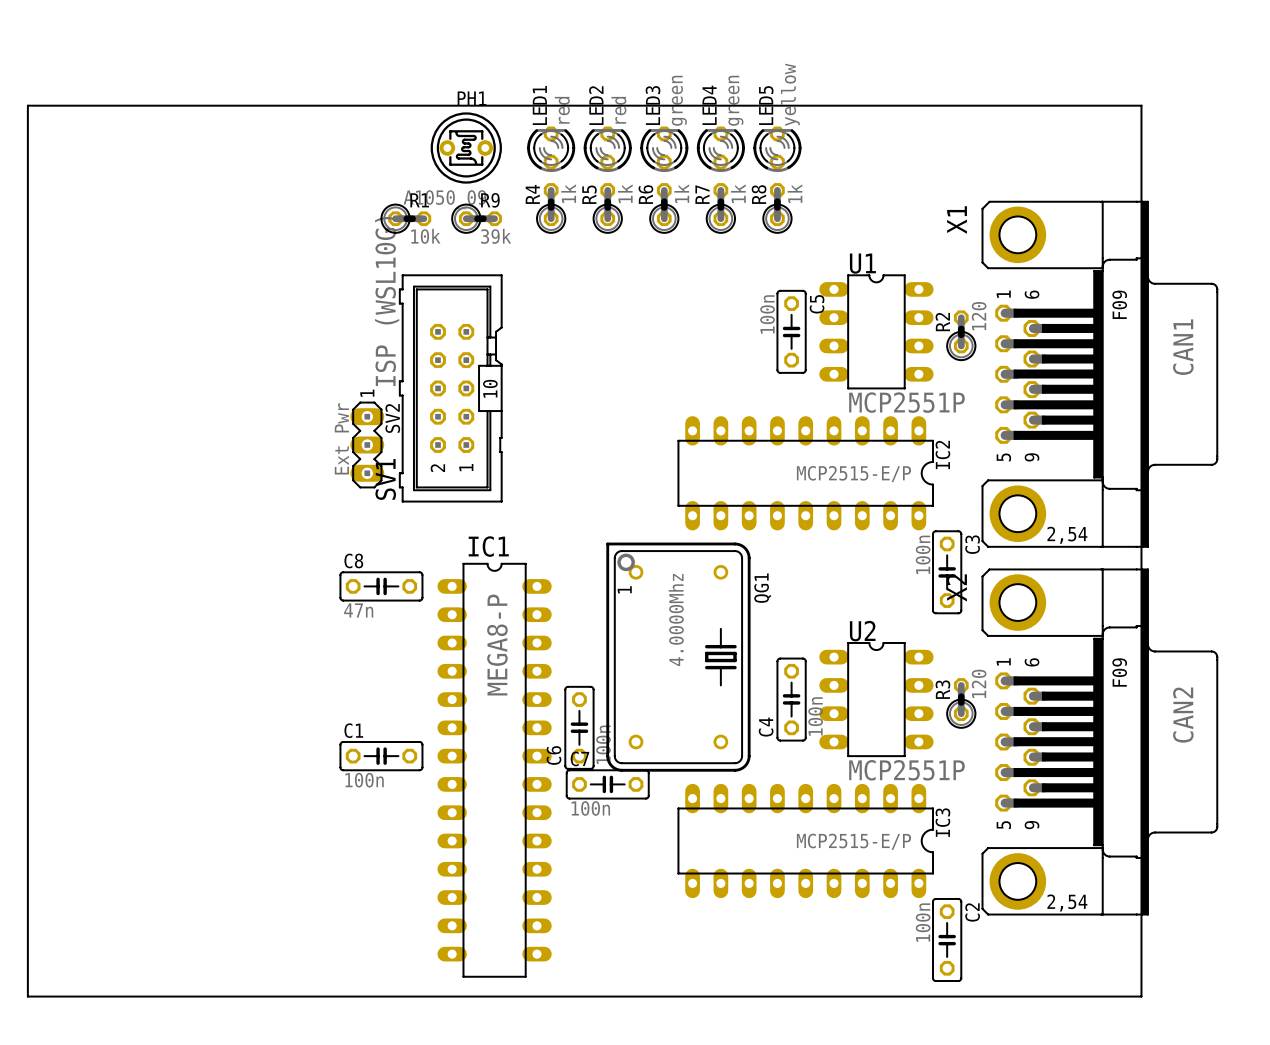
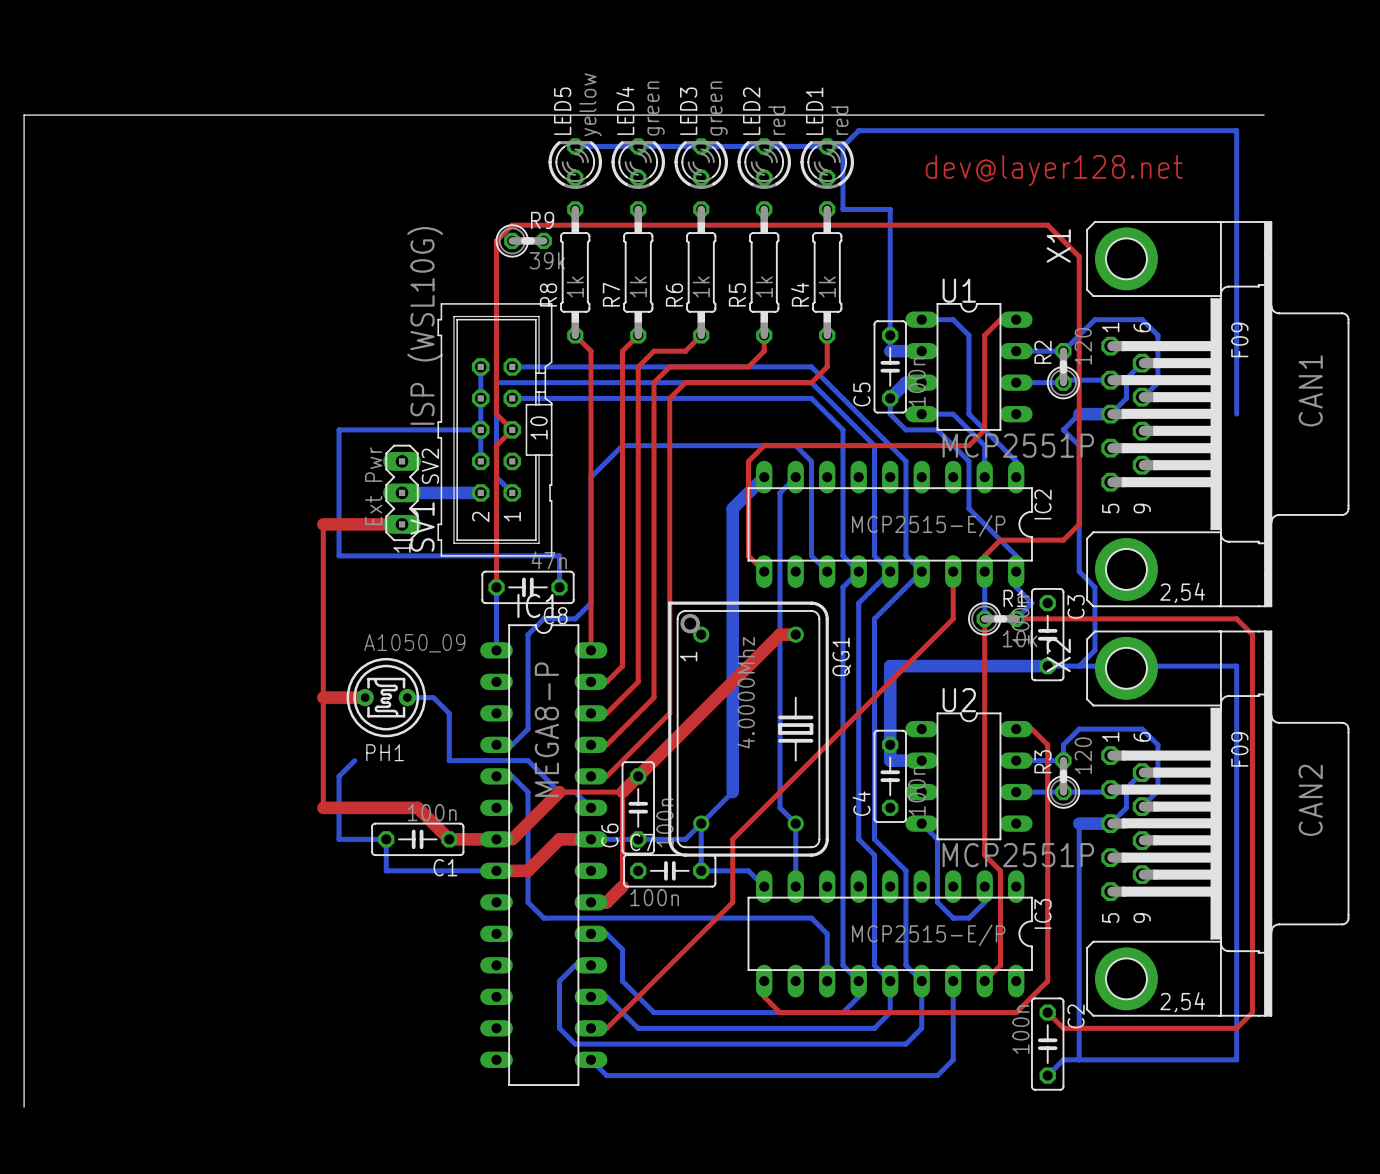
board edge: (1141, 105) (1141, 996) (27, 996) -> none
bottom track: none -> (575, 146) (842, 146)
bottom track: none -> (842, 146) (842, 209) (890, 209) (890, 351) (921, 351)
bottom track: none -> (842, 146) (858, 130) (1236, 130) (1236, 414)
PH1 rotation: 0° (466, 148) -> 180° (386, 697)
PH1 position: (466, 148) -> (386, 697)
LED1 position: (551, 149) -> (827, 163)
LED2 position: (607, 149) -> (764, 163)
LED3 position: (664, 149) -> (701, 163)
LED4 position: (720, 149) -> (638, 163)
LED5 position: (777, 149) -> (575, 163)
text: none -> dev@layer128.net (1054, 170)
R4 footprint: [536, 183, 567, 234] -> [812, 201, 843, 344]
R5 footprint: [592, 183, 623, 234] -> [749, 201, 780, 344]
R6 footprint: [649, 183, 680, 234] -> [686, 201, 717, 344]
R7 footprint: [705, 183, 736, 234] -> [623, 201, 654, 344]
R8 footprint: [762, 183, 793, 234] -> [560, 201, 591, 344]
R4 value position: 1k (568, 193) -> 1k (827, 286)
R5 value position: 1k (625, 193) -> 1k (764, 286)
R6 value position: 1k (681, 193) -> 1k (701, 286)
R7 value position: 1k (738, 193) -> 1k (638, 286)
R8 value position: 1k (794, 193) -> 1k (575, 286)
R4 name position: R4 (532, 194) -> R4 (800, 294)
R5 name position: R5 (589, 194) -> R5 (737, 295)
R6 name position: R6 (645, 194) -> R6 (674, 295)
R7 name position: R7 (702, 194) -> R7 (611, 294)
R8 name position: R8 (759, 194) -> R8 (548, 295)
R1 position: (405, 218) -> (996, 618)
bottom track: none -> (921, 319) (953, 319) (968, 335) (968, 414) (1016, 461) (1016, 477)
top track: none -> (1016, 319) (1000, 319) (984, 335) (984, 429) (968, 445) (764, 445) (748, 461) (748, 555) (764, 571)
top track: none -> (575, 335) (591, 351) (591, 650)
top track: none -> (638, 335) (622, 351) (622, 666) (606, 681) (591, 681)
top track: none -> (701, 335) (685, 351) (654, 351) (638, 366) (638, 681) (606, 713) (591, 713)
top track: none -> (764, 335) (764, 351) (748, 366) (669, 366) (654, 382) (654, 697) (606, 744) (591, 744)
top track: none -> (827, 335) (827, 366) (811, 382) (685, 382) (669, 398) (669, 713) (606, 776) (591, 776)
bottom track: none -> (1016, 351) (1063, 351) (1094, 319) (1142, 319) (1157, 335) (1157, 382) (1142, 398)
bottom track: none -> (1142, 363) (1126, 378) (1126, 398) (1110, 414) (1079, 414) (1063, 429) (1079, 445) (1079, 571) (1094, 587) (1094, 650) (1079, 666)
bottom track: none -> (480, 366) (480, 461)
bottom track: none -> (512, 366) (811, 366) (905, 461) (905, 555) (921, 571) (874, 618) (874, 839) (905, 870) (905, 965) (921, 981) (921, 1028) (905, 1044) (575, 1044) (559, 1028) (559, 981) (575, 965) (591, 965)
C5 rotation: 0° (791, 331) -> 180° (890, 366)
bottom track: none -> (1110, 380) (1016, 382)
bottom track: none -> (921, 382) (905, 382) (890, 398) (890, 414) (905, 429) (937, 429) (968, 461) (968, 508) (1016, 555) (1016, 587) (1031, 603) (1016, 618)
bottom track: none -> (512, 398) (811, 398) (842, 429) (842, 555) (858, 571) (842, 587) (842, 965) (858, 981) (858, 996) (842, 1012) (654, 1012) (622, 981) (622, 949) (606, 933) (591, 933)
bottom track: none -> (921, 414) (953, 414) (984, 445) (984, 477)
bottom track: none -> (480, 429) (339, 429) (339, 555) (559, 555) (559, 587)
SV2 text position: 1 (367, 393) -> 1 (402, 548)
bottom track: none -> (764, 477) (732, 508) (732, 792) (685, 839) (591, 839)
bottom track: none -> (795, 477) (779, 492) (779, 807) (795, 823) (795, 886)
bottom track: none -> (402, 492) (480, 492)
bottom track: none -> (512, 492) (496, 477) (496, 382) (811, 382) (874, 445) (874, 555) (890, 571) (858, 603) (858, 839) (874, 855) (874, 965) (890, 981) (890, 1012) (874, 1028) (638, 1028) (606, 996) (591, 996)
top track: none -> (402, 524) (323, 524) (323, 807) (417, 807) (449, 839) (512, 839) (559, 792) (622, 792)
bottom track: none -> (827, 571) (811, 555) (811, 461) (795, 445) (622, 445) (591, 477) (591, 603) (575, 618) (543, 618) (528, 634) (528, 729) (512, 744) (496, 744)
top track: none -> (953, 571) (953, 618) (732, 839) (732, 902) (606, 1028) (591, 1028)
bottom track: none -> (984, 571) (984, 618)
top track: none -> (984, 571) (984, 555) (1000, 540) (1063, 540) (1079, 524) (1079, 256) (1047, 225) (512, 225) (496, 240) (496, 414) (512, 429) (496, 445) (496, 587)
bottom track: none -> (496, 587) (496, 650)
top track: none -> (984, 618) (984, 855) (1000, 870) (1000, 965) (984, 981)
top track: none -> (1016, 618) (1236, 618) (1252, 634) (1252, 1012) (1236, 1028) (1063, 1028) (1047, 1012)
top track: none -> (795, 634) (779, 634) (622, 792)
C8 rotation: 0° (381, 586) -> 180° (528, 587)
C8 position: (381, 586) -> (528, 587)
top track: none -> (323, 697) (365, 697)
bottom track: none -> (402, 697) (433, 697) (449, 713) (449, 760) (528, 760) (559, 792) (575, 792) (591, 807)
top track: none -> (1031, 729) (1047, 744) (1047, 981) (1016, 1012) (779, 1012) (764, 996) (764, 981)
bottom track: none -> (354, 760) (339, 776) (339, 839) (386, 839) (386, 870) (496, 870)
bottom track: none -> (921, 760) (890, 760) (890, 666) (1236, 666) (1236, 1059) (1063, 1059) (1047, 1075)
bottom track: none -> (1016, 760) (1063, 760) (1063, 744) (1079, 729) (1142, 729) (1157, 744) (1157, 790) (1142, 806)
bottom track: none -> (1142, 772) (1126, 788) (1126, 807) (1110, 823) (1079, 823) (1079, 1059)
bottom track: none -> (496, 776) (512, 776) (528, 792) (528, 902) (543, 918) (811, 918) (827, 933) (827, 981)
C4 position: (791, 699) -> (890, 776)
bottom track: none -> (1110, 789) (1110, 792) (1016, 792)
top track: none -> (622, 792) (622, 886) (606, 902) (591, 902)
bottom track: none -> (701, 823) (701, 870) (748, 870) (764, 886)
bottom track: none -> (921, 823) (937, 839) (937, 902) (953, 918) (968, 918) (984, 902) (984, 886)
C1 rotation: 0° (381, 756) -> 180° (417, 839)
top track: none -> (591, 839) (559, 839) (528, 870) (496, 870)
bottom track: none -> (953, 981) (953, 1059) (937, 1075) (606, 1075) (591, 1059)

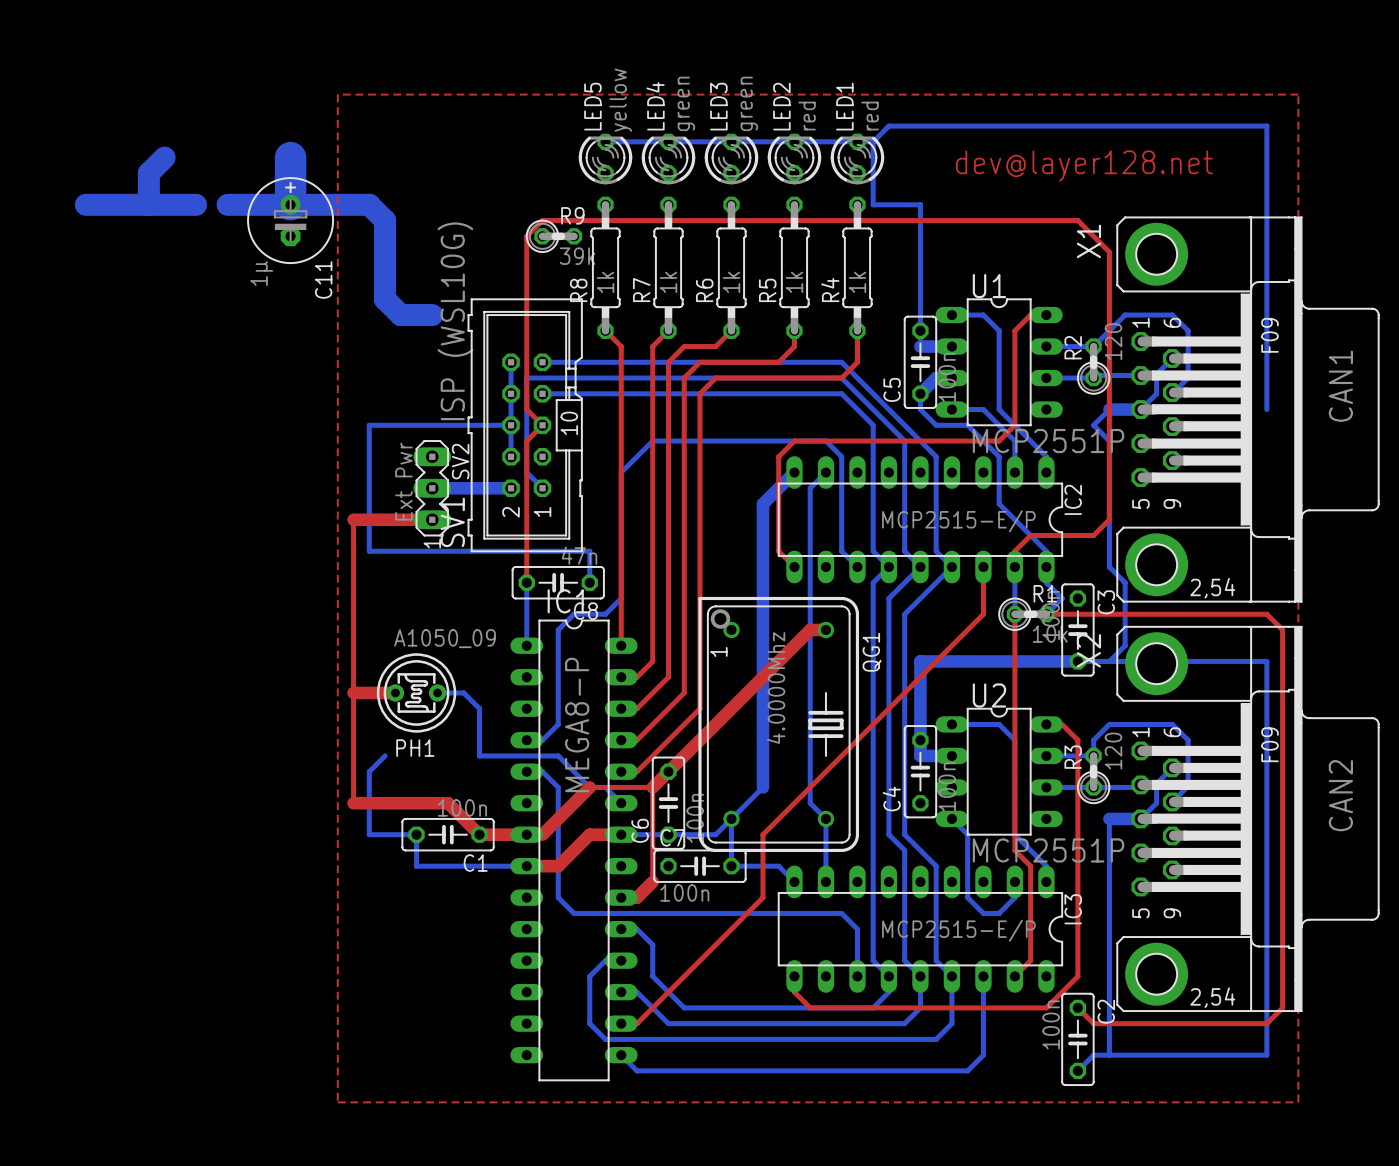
top zone outline: none -> (337, 94) (337, 1102) (1298, 1102) (1298, 94) (337, 94)
board edge: (1264, 115) (24, 115) (24, 1107) -> none
bottom track: none -> (164, 157) (148, 173) (148, 204)
bottom track: none -> (290, 157) (290, 204)
bottom track: none -> (85, 204) (196, 204)
bottom track: none -> (227, 204) (369, 204) (385, 220) (385, 299) (400, 315) (432, 315)
C11: none -> 1µ (290, 220)
bottom track: none -> (951, 724) (999, 724) (1014, 740) (1014, 834) (1046, 866) (1046, 881)

